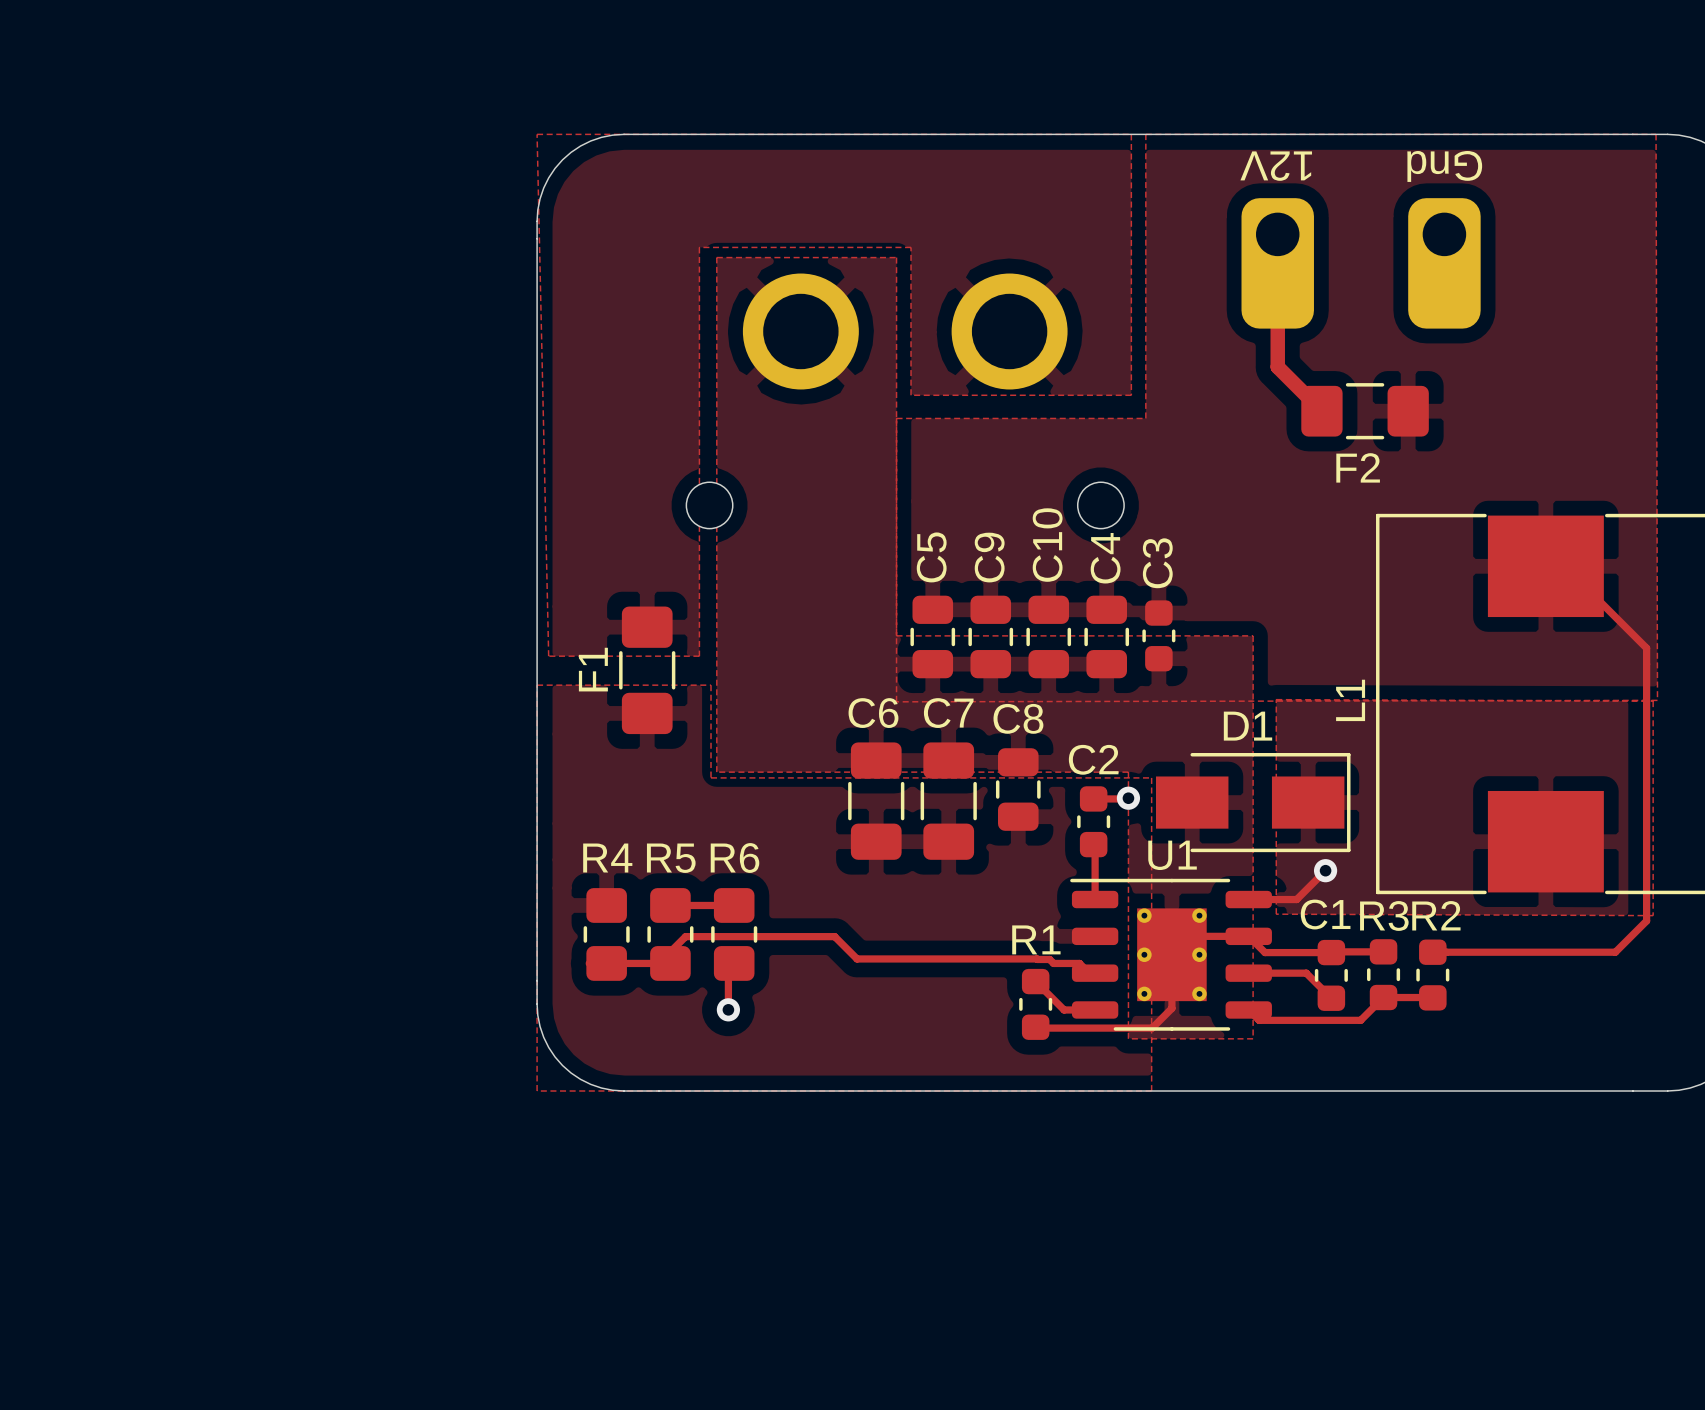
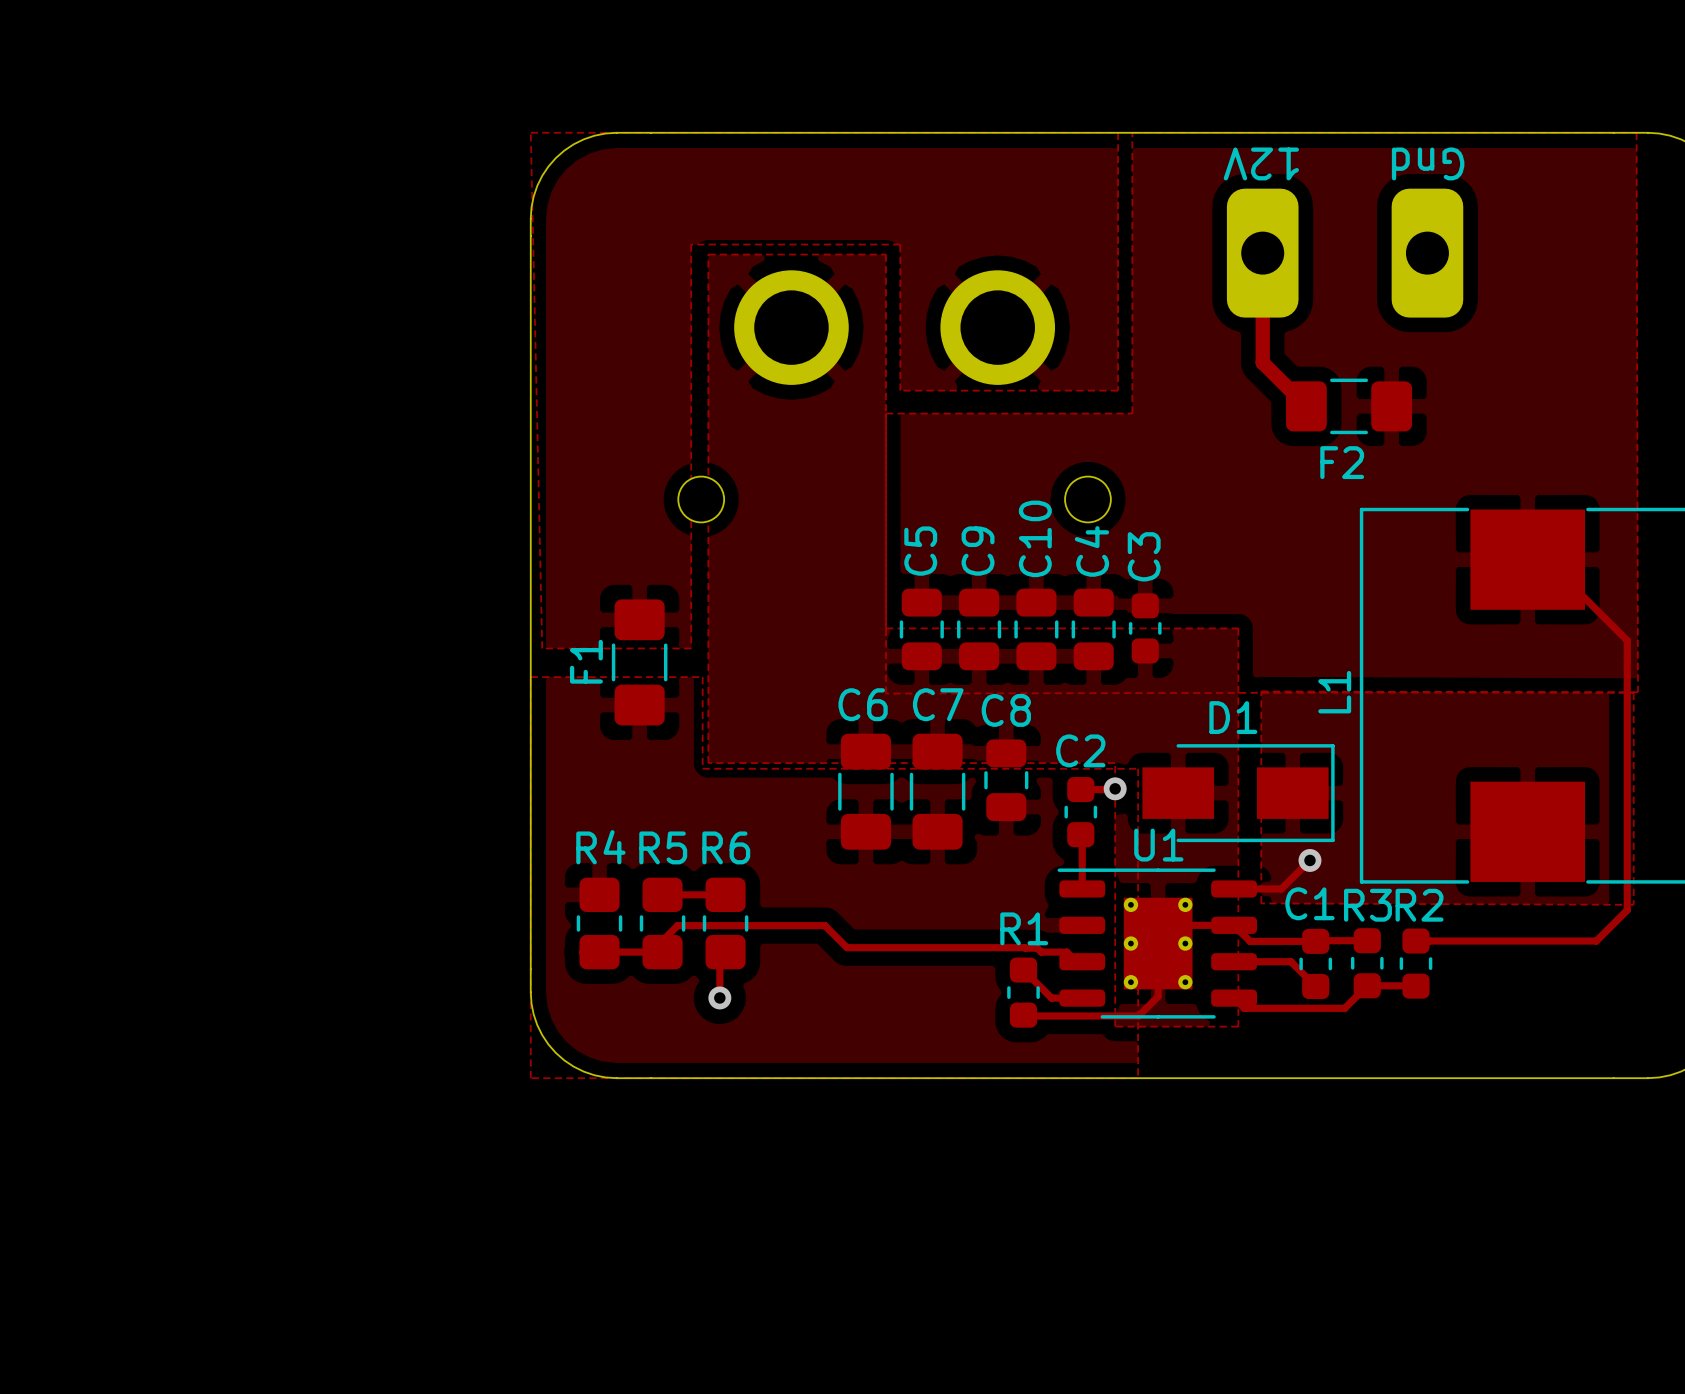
part footprint: [1241, 198, 1314, 329] -> [1226, 188, 1299, 318]
part footprint: [1408, 198, 1481, 329] -> [1391, 188, 1464, 318]

